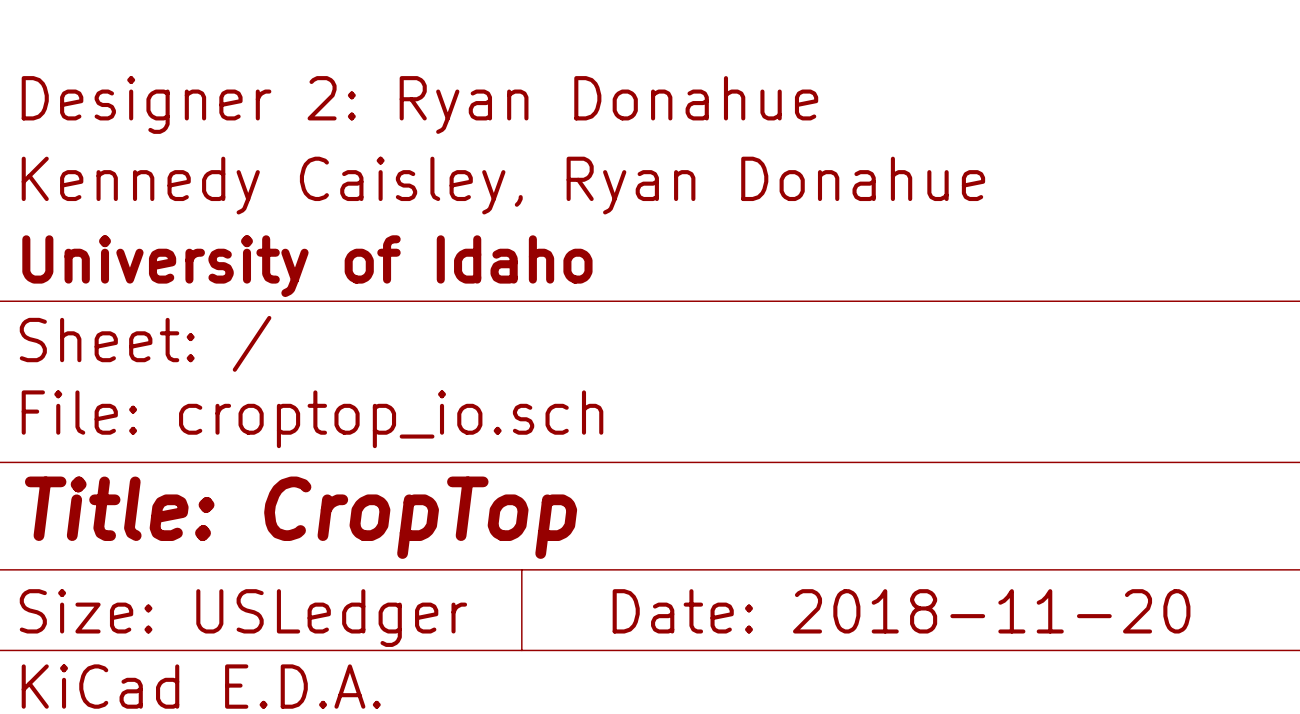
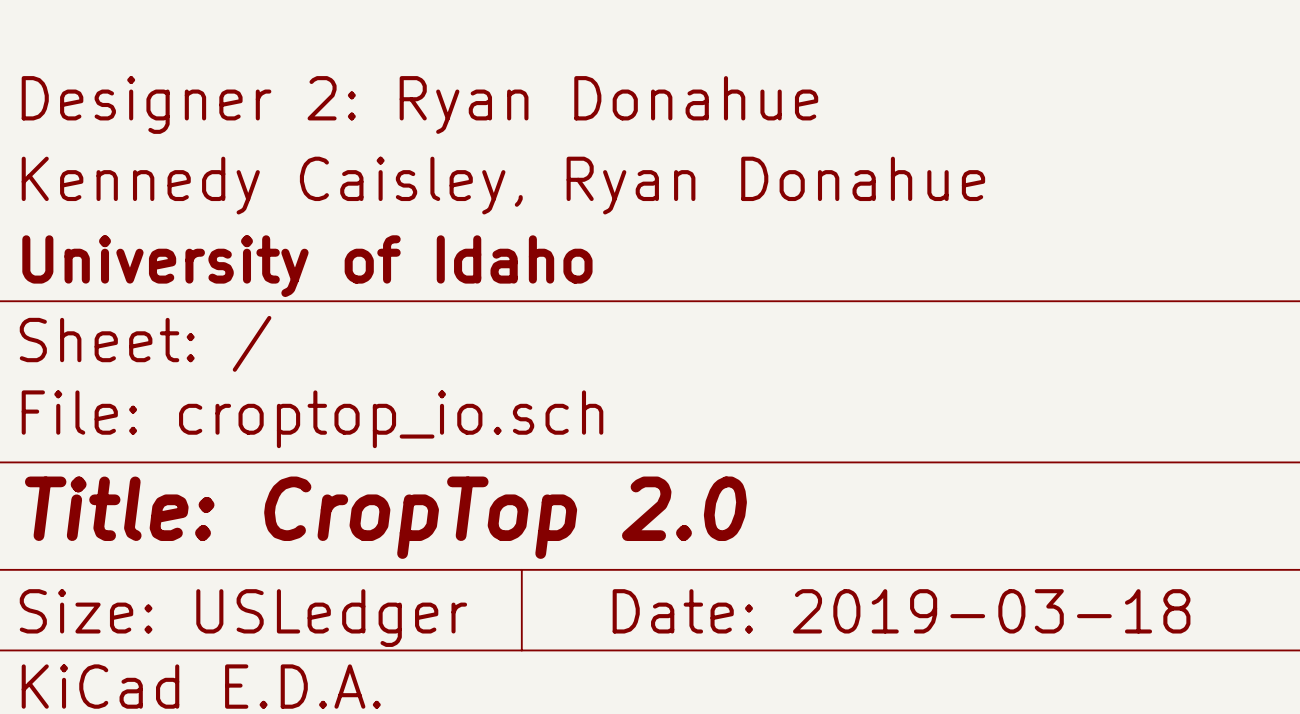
title block: Title: CropTop (301, 517) -> Title: CropTop 2.0 (385, 517)
title block: Date: 2018-11-20 (901, 611) -> Date: 2019-03-18 (901, 611)

